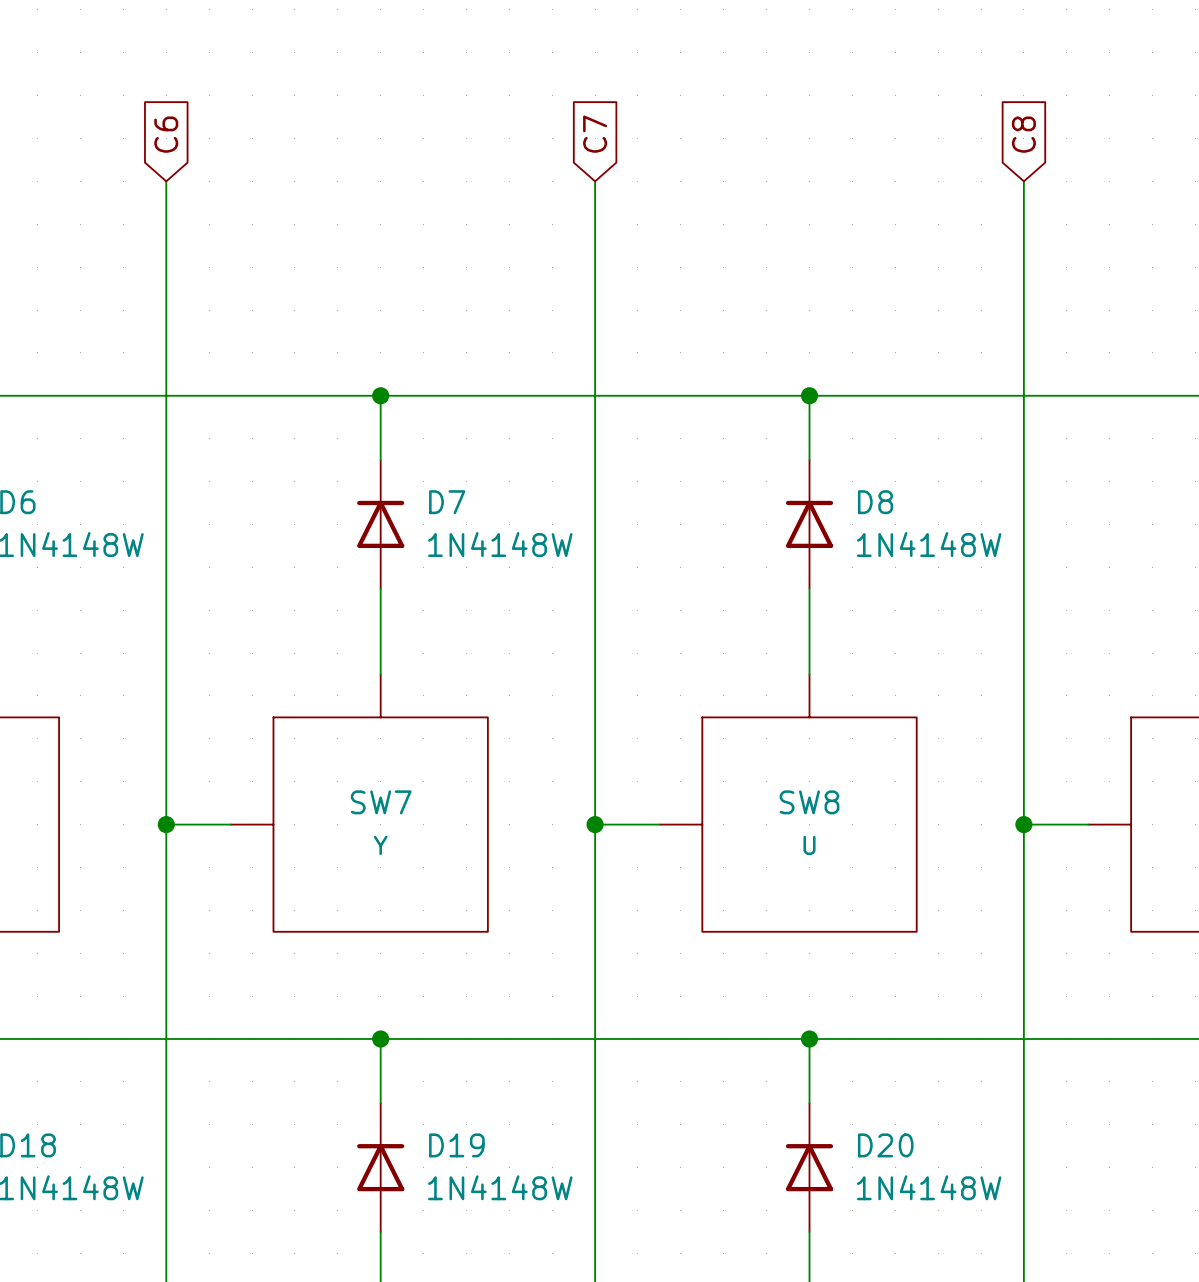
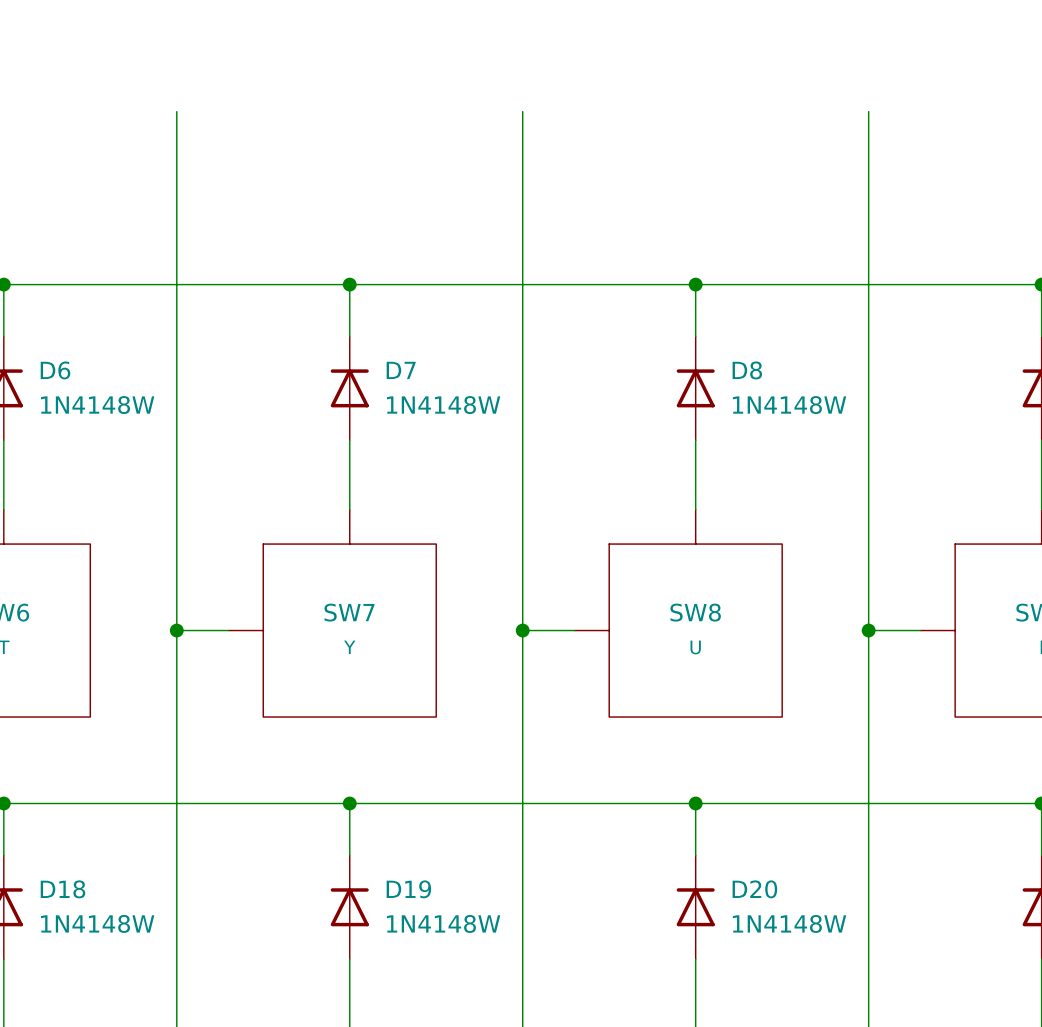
global label: C6 (166, 134) -> none
global label: C7 (595, 134) -> none
global label: C8 (1023, 134) -> none

